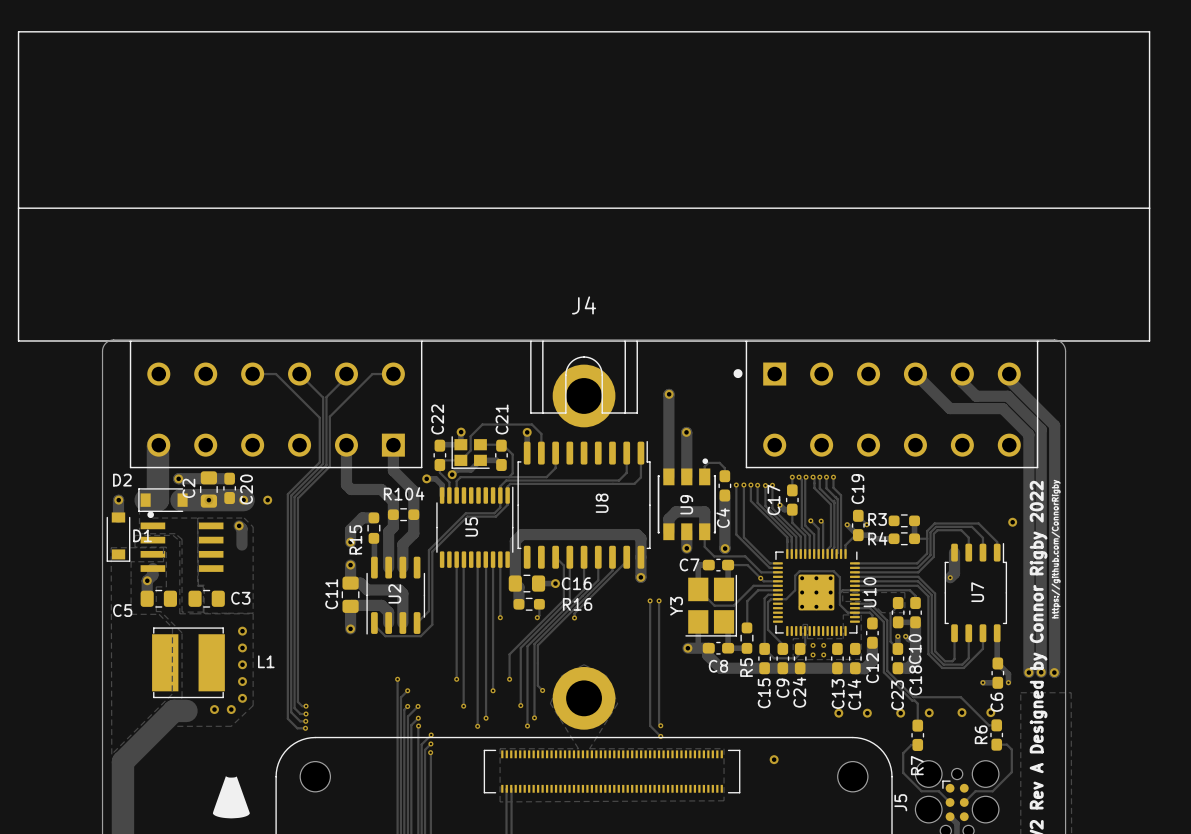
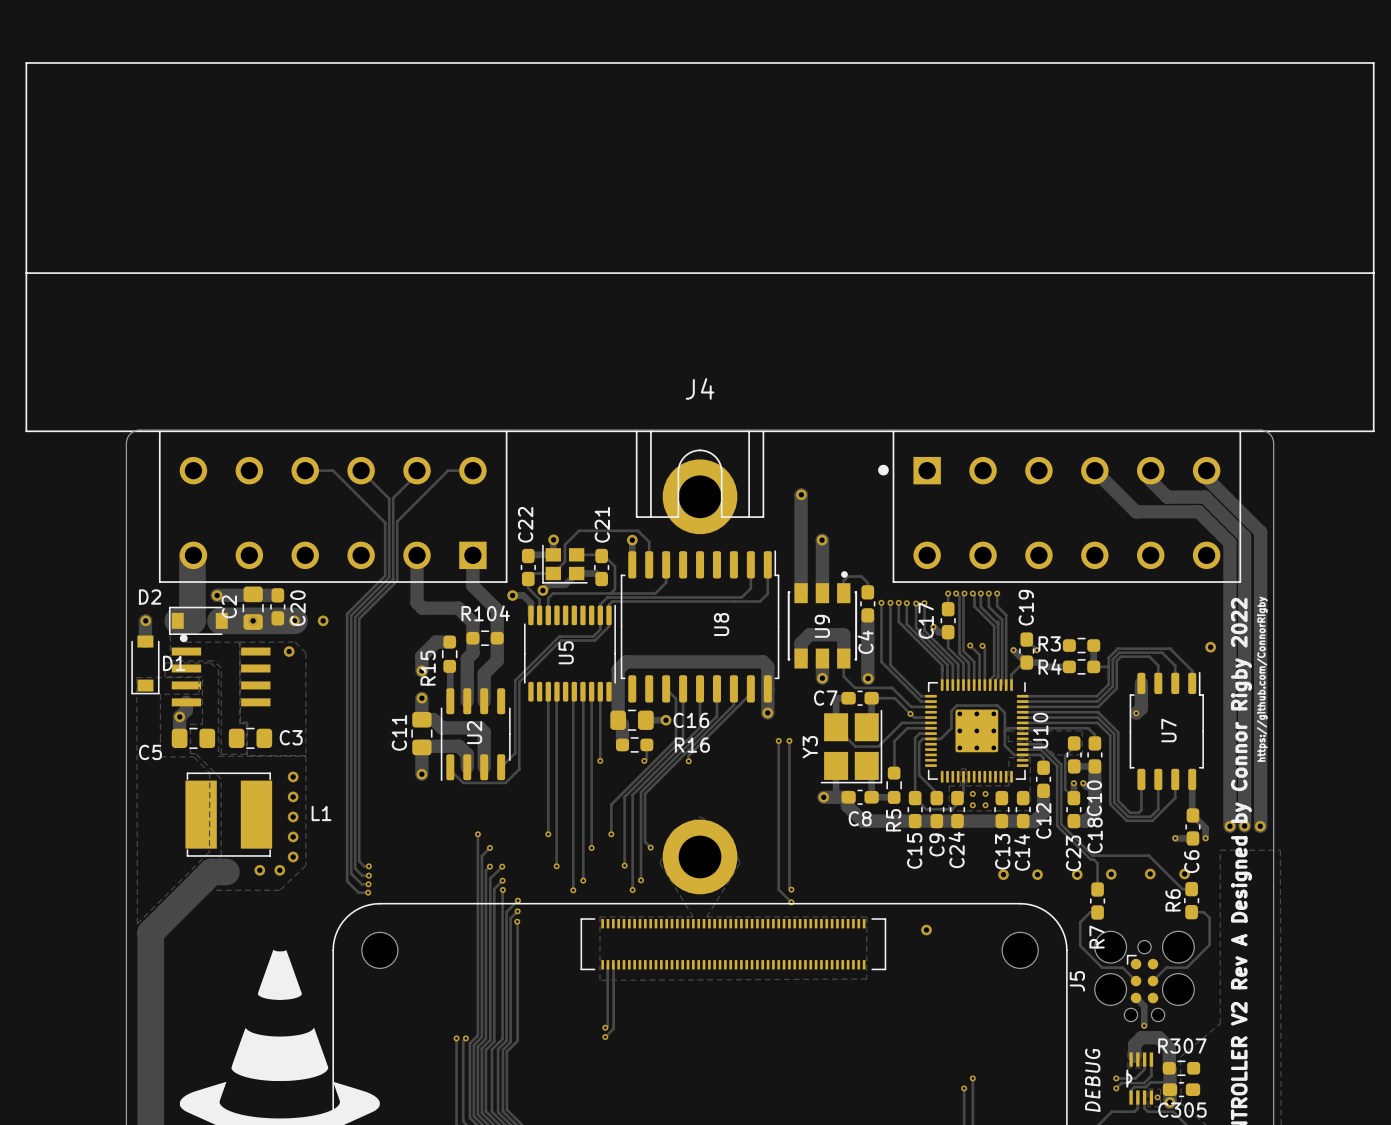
track: (239, 525) (241, 528) (241, 545) -> none

